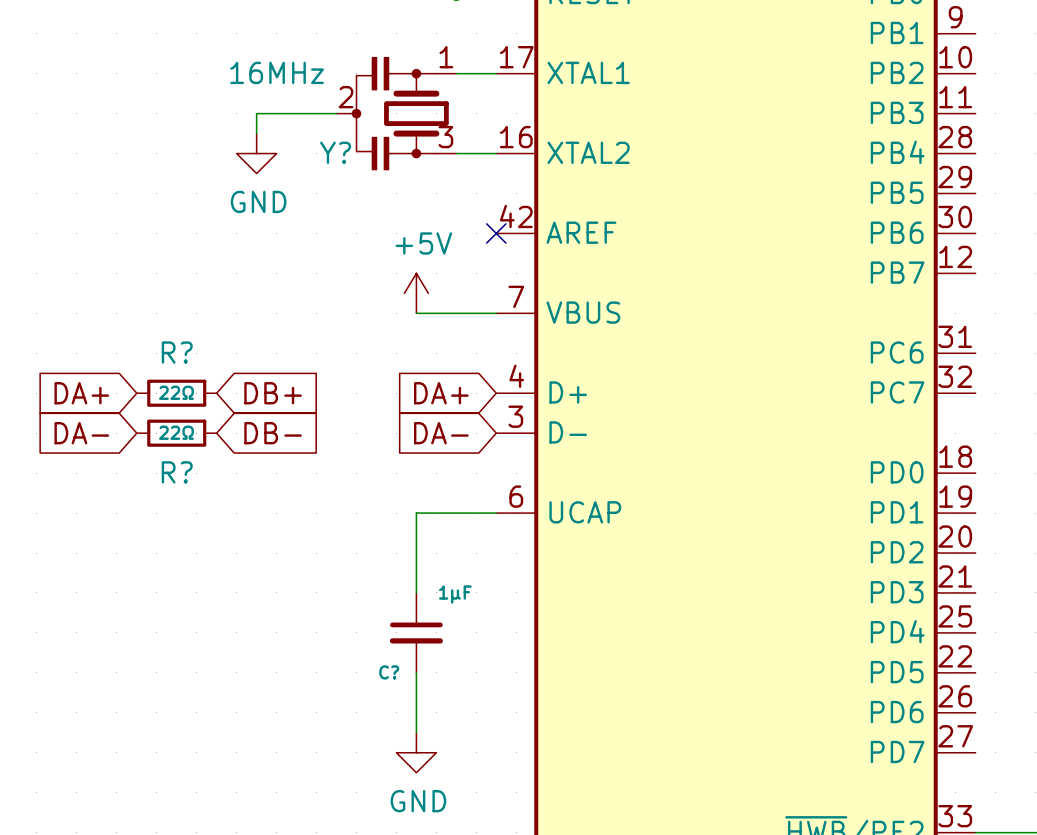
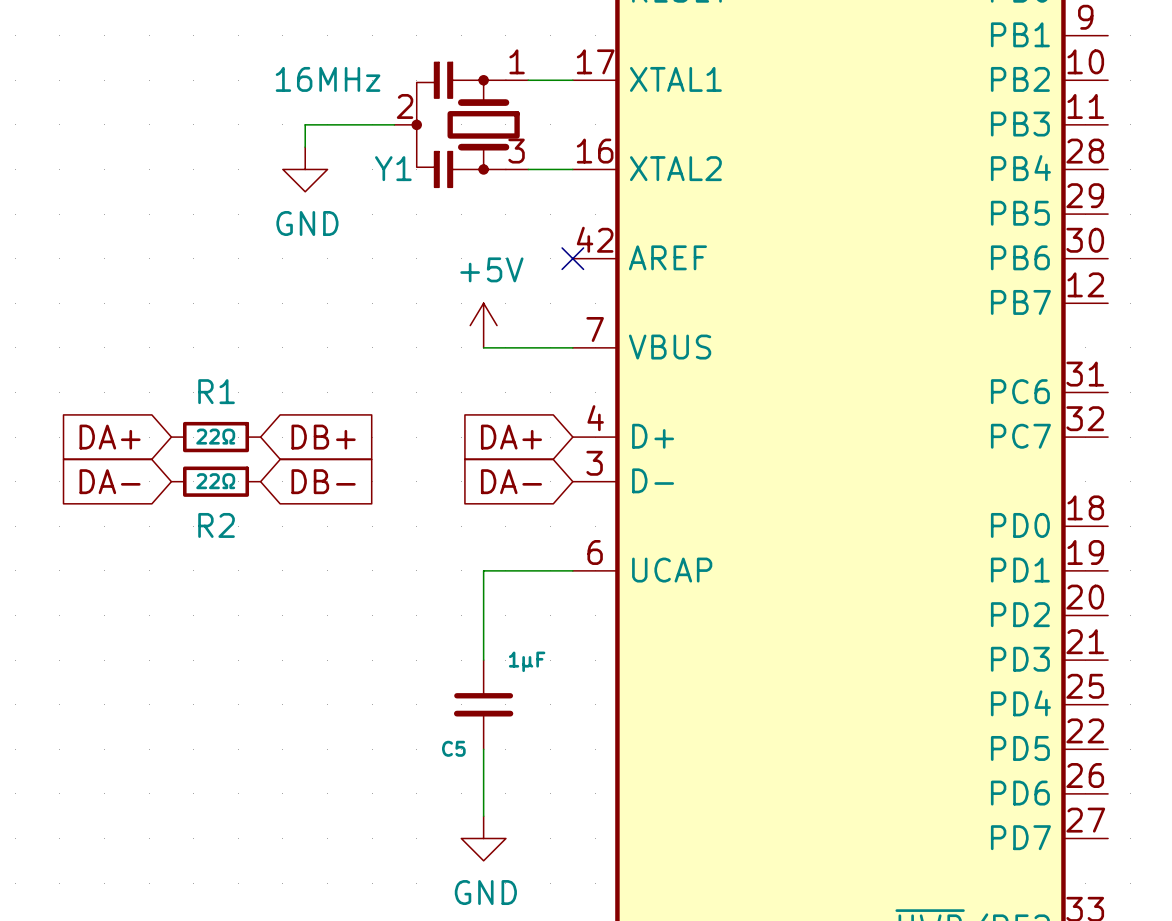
Y? name: Y? (335, 152) -> Y1 (393, 168)
R? name: R? (177, 352) -> R1 (216, 391)
R? name: R? (177, 472) -> R2 (216, 525)
C? name: C? (389, 672) -> C5 (453, 748)

